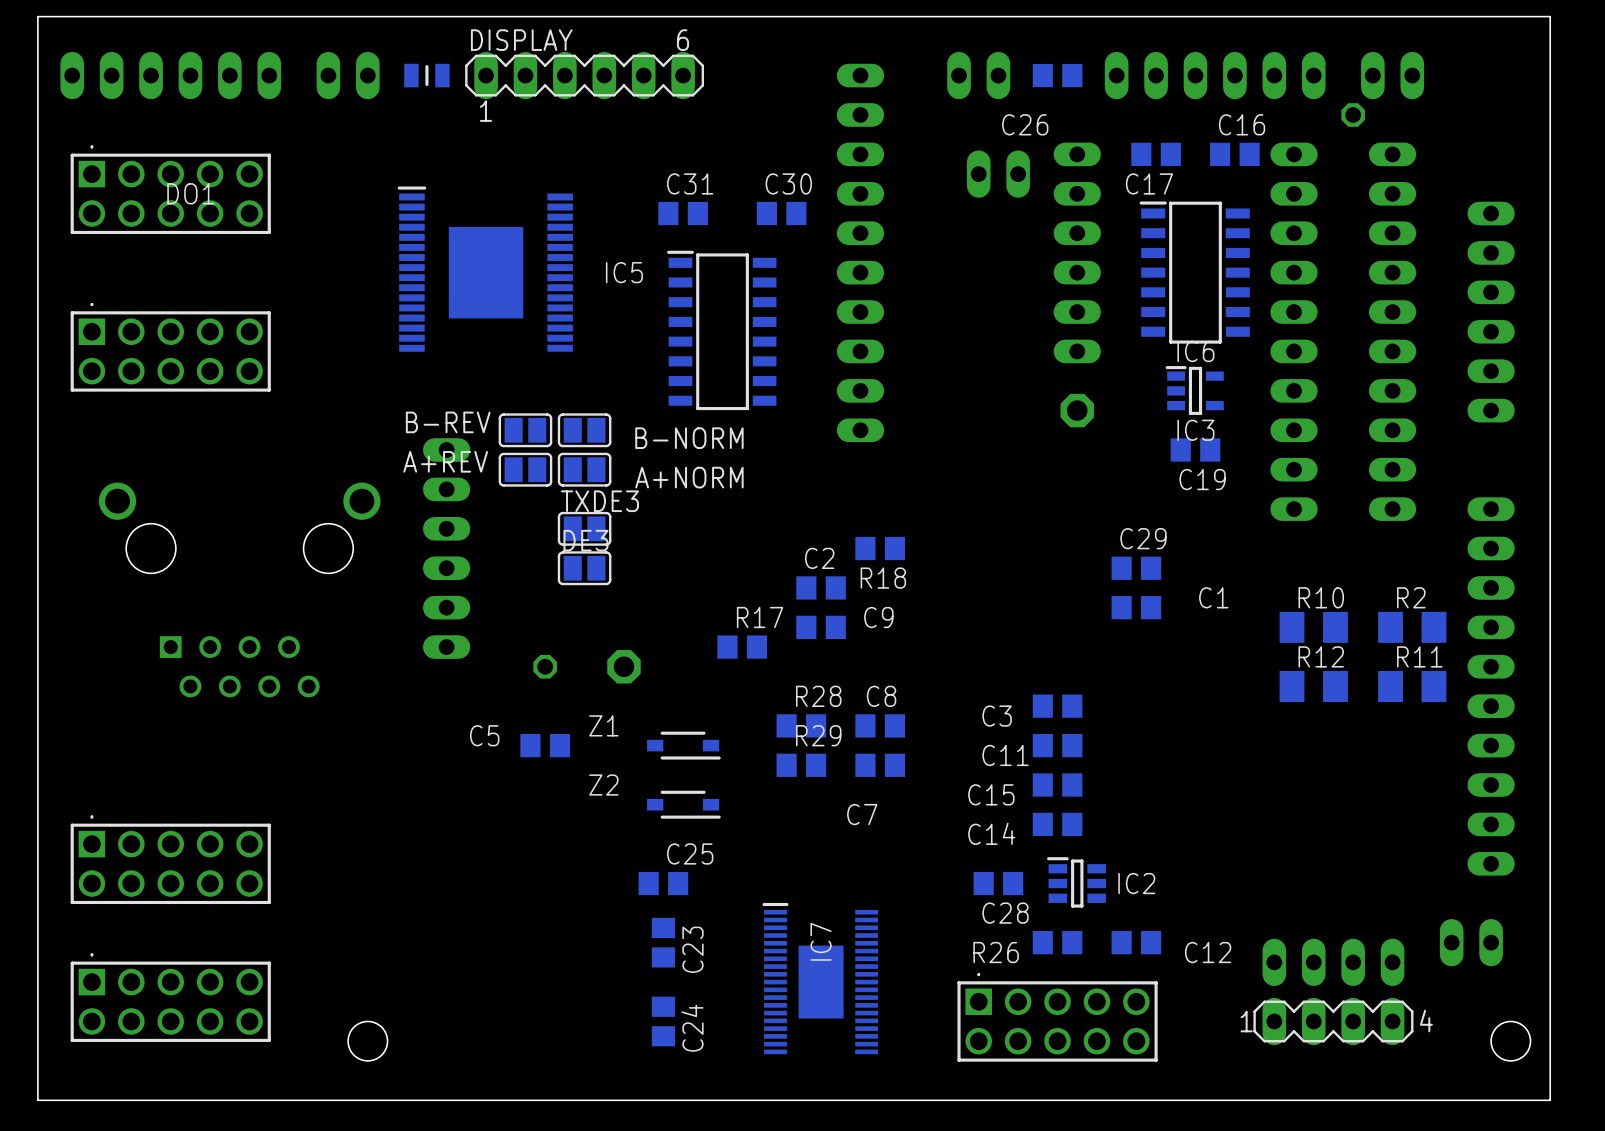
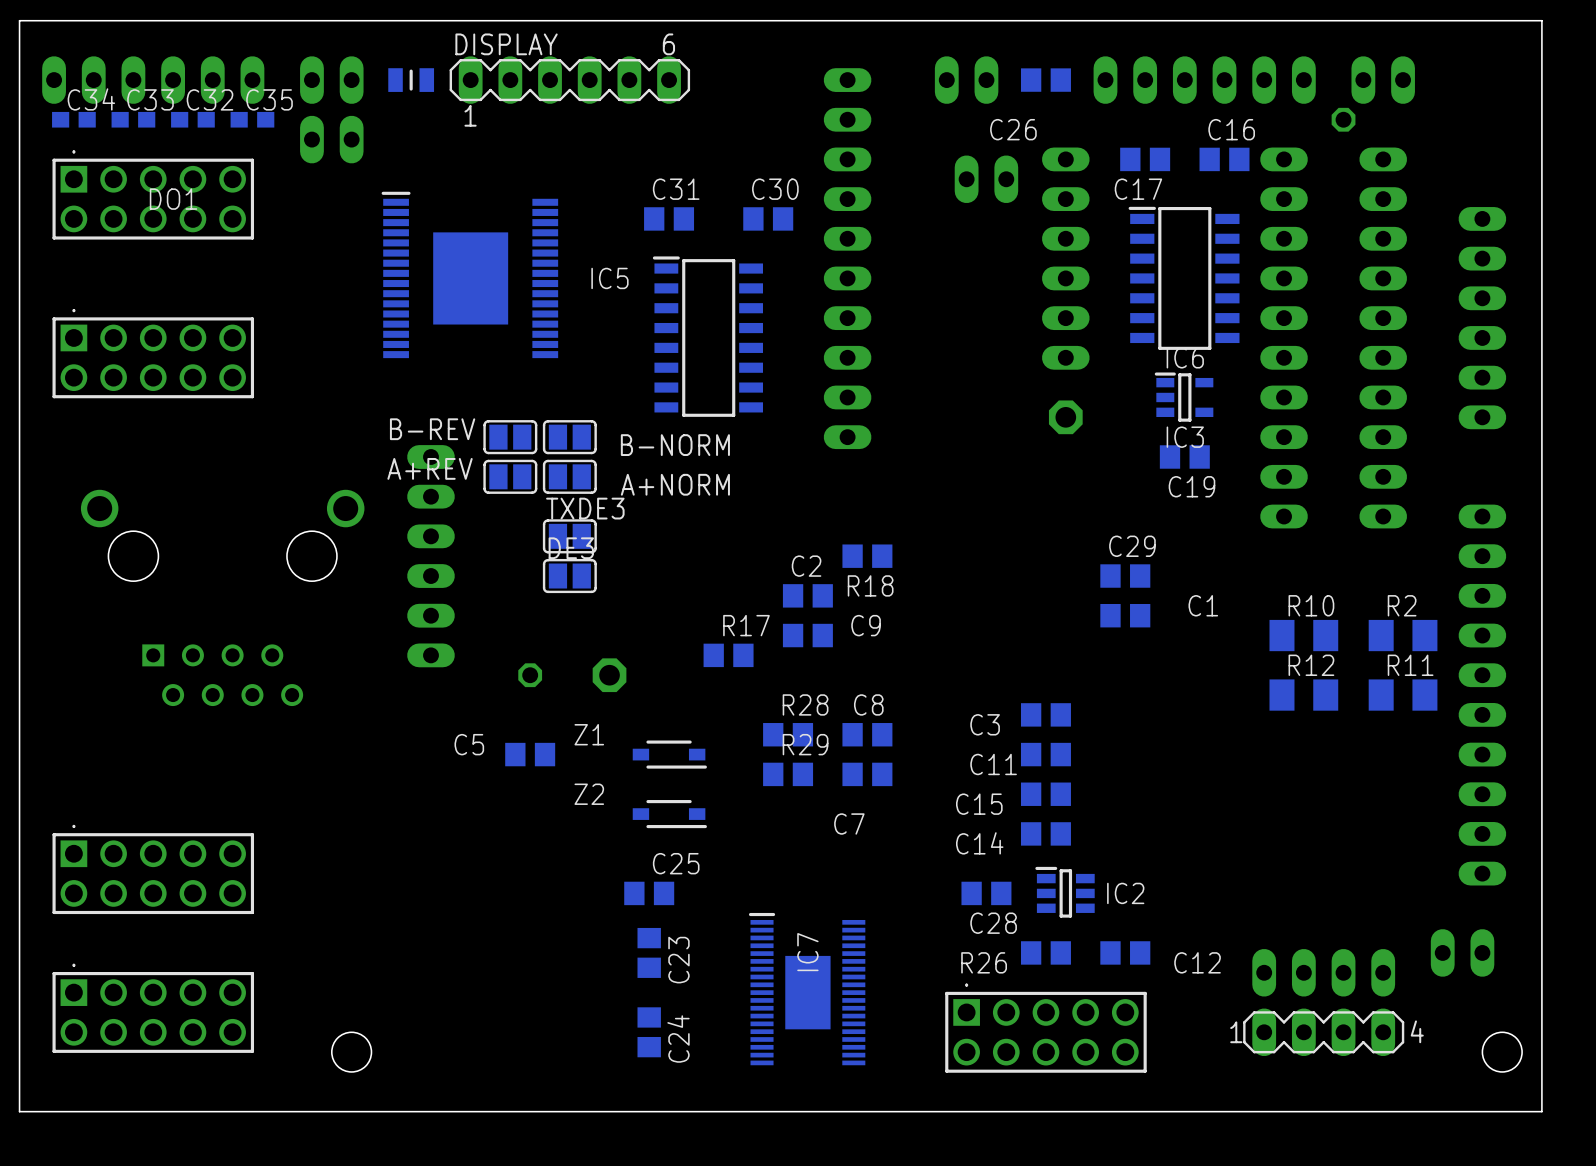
C34: none -> (73, 119)
C33: none -> (133, 119)
C32: none -> (192, 119)
C35: none -> (252, 119)
part: none -> (331, 139)

